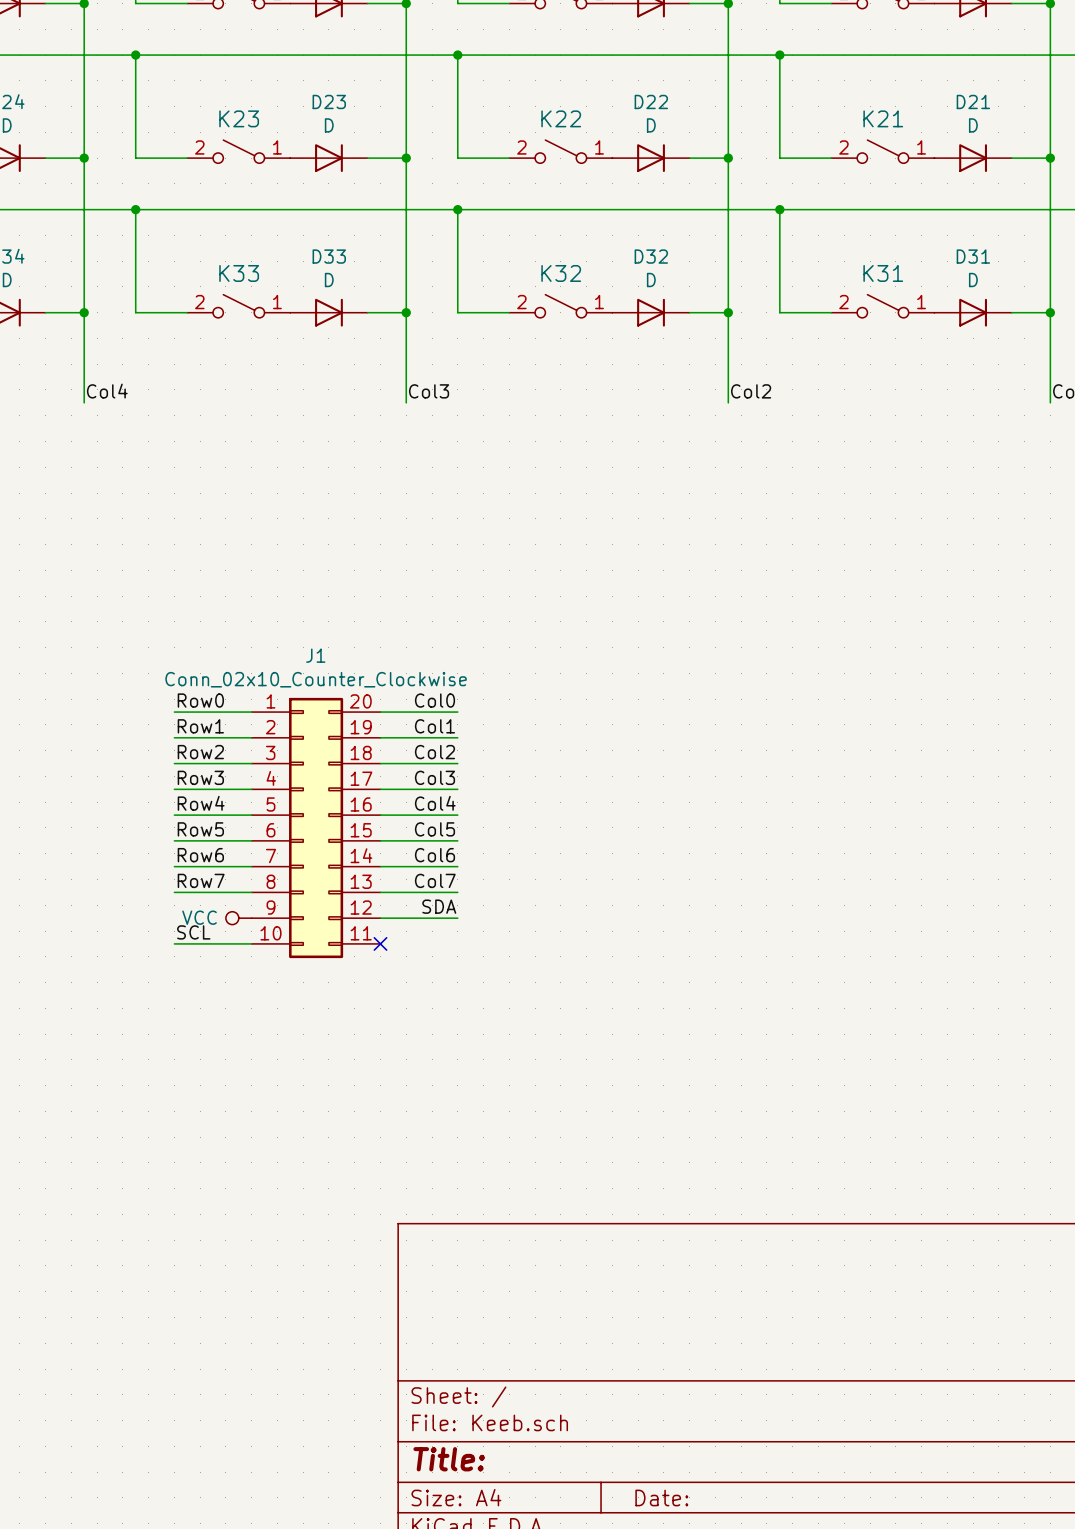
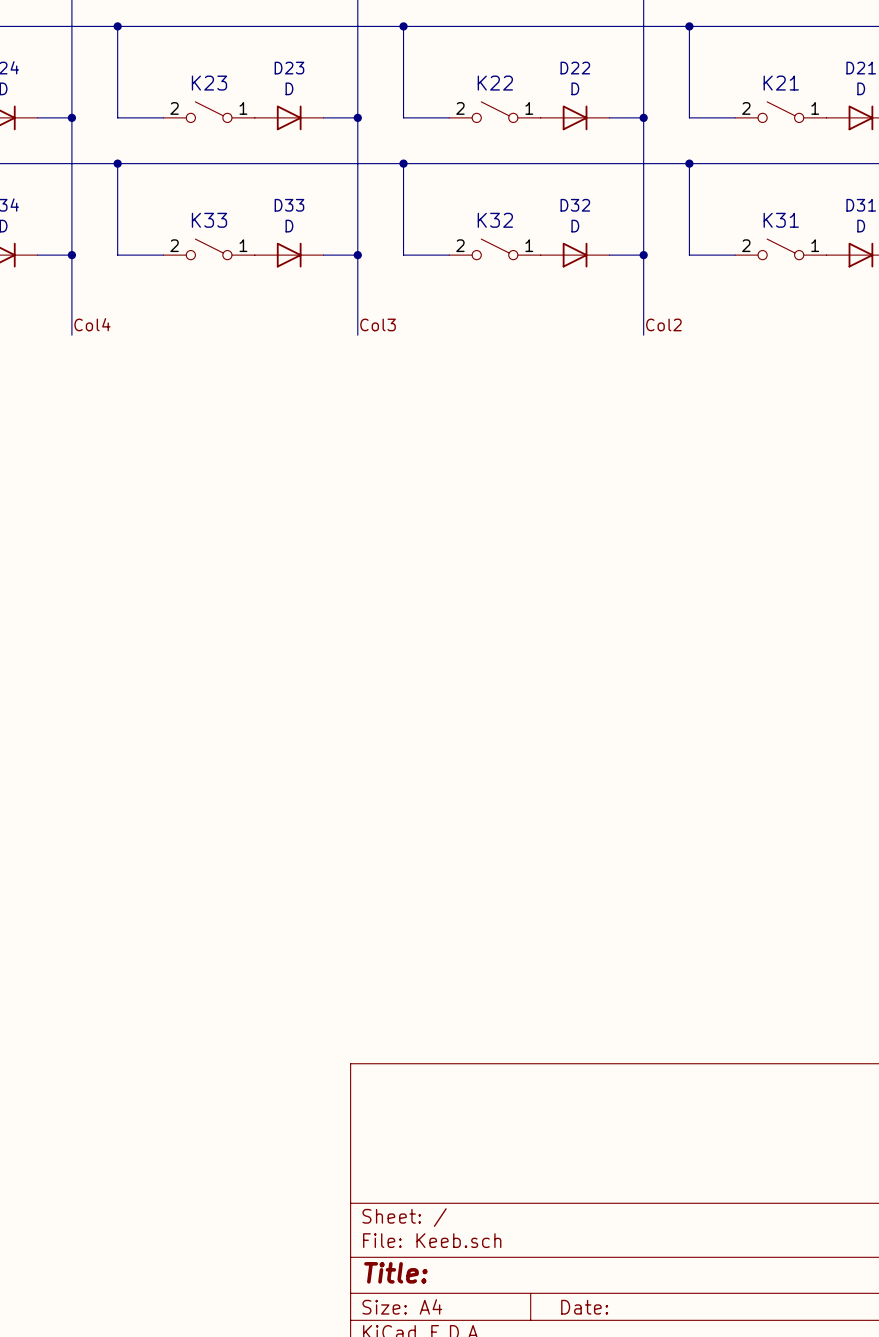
label: Row0 (200, 700) -> none
label: Col0 (434, 700) -> none
wire: (174, 712) (251, 712) -> none
wire: (380, 712) (457, 712) -> none
label: Row1 (200, 726) -> none
label: Col1 (434, 726) -> none
wire: (174, 737) (251, 737) -> none
wire: (380, 737) (457, 737) -> none
label: Row2 (200, 752) -> none
label: Col2 (434, 752) -> none
wire: (174, 763) (251, 763) -> none
wire: (380, 763) (457, 763) -> none
label: Row3 (200, 777) -> none
label: Col3 (434, 777) -> none
wire: (174, 789) (251, 789) -> none
wire: (380, 789) (457, 789) -> none
label: Row4 (201, 803) -> none
label: Col4 (435, 803) -> none
wire: (174, 815) (251, 815) -> none
wire: (380, 815) (457, 815) -> none
J1: Conn_02x10_Counter_Clockwise (316, 827) -> none
label: Row5 (200, 829) -> none
label: Col5 (434, 829) -> none
wire: (174, 840) (251, 840) -> none
wire: (380, 840) (457, 840) -> none
label: Row6 (200, 855) -> none
label: Col6 (434, 855) -> none
wire: (174, 866) (251, 866) -> none
wire: (380, 866) (457, 866) -> none
label: Row7 (201, 880) -> none
label: Col7 (435, 880) -> none
wire: (174, 892) (251, 892) -> none
wire: (380, 892) (457, 892) -> none
label: SDA (439, 906) -> none
power symbol: VCC (238, 918) -> none
wire: (380, 918) (457, 918) -> none
label: SCL (193, 932) -> none
wire: (174, 943) (251, 943) -> none
no-connect mark: (380, 943) -> none

